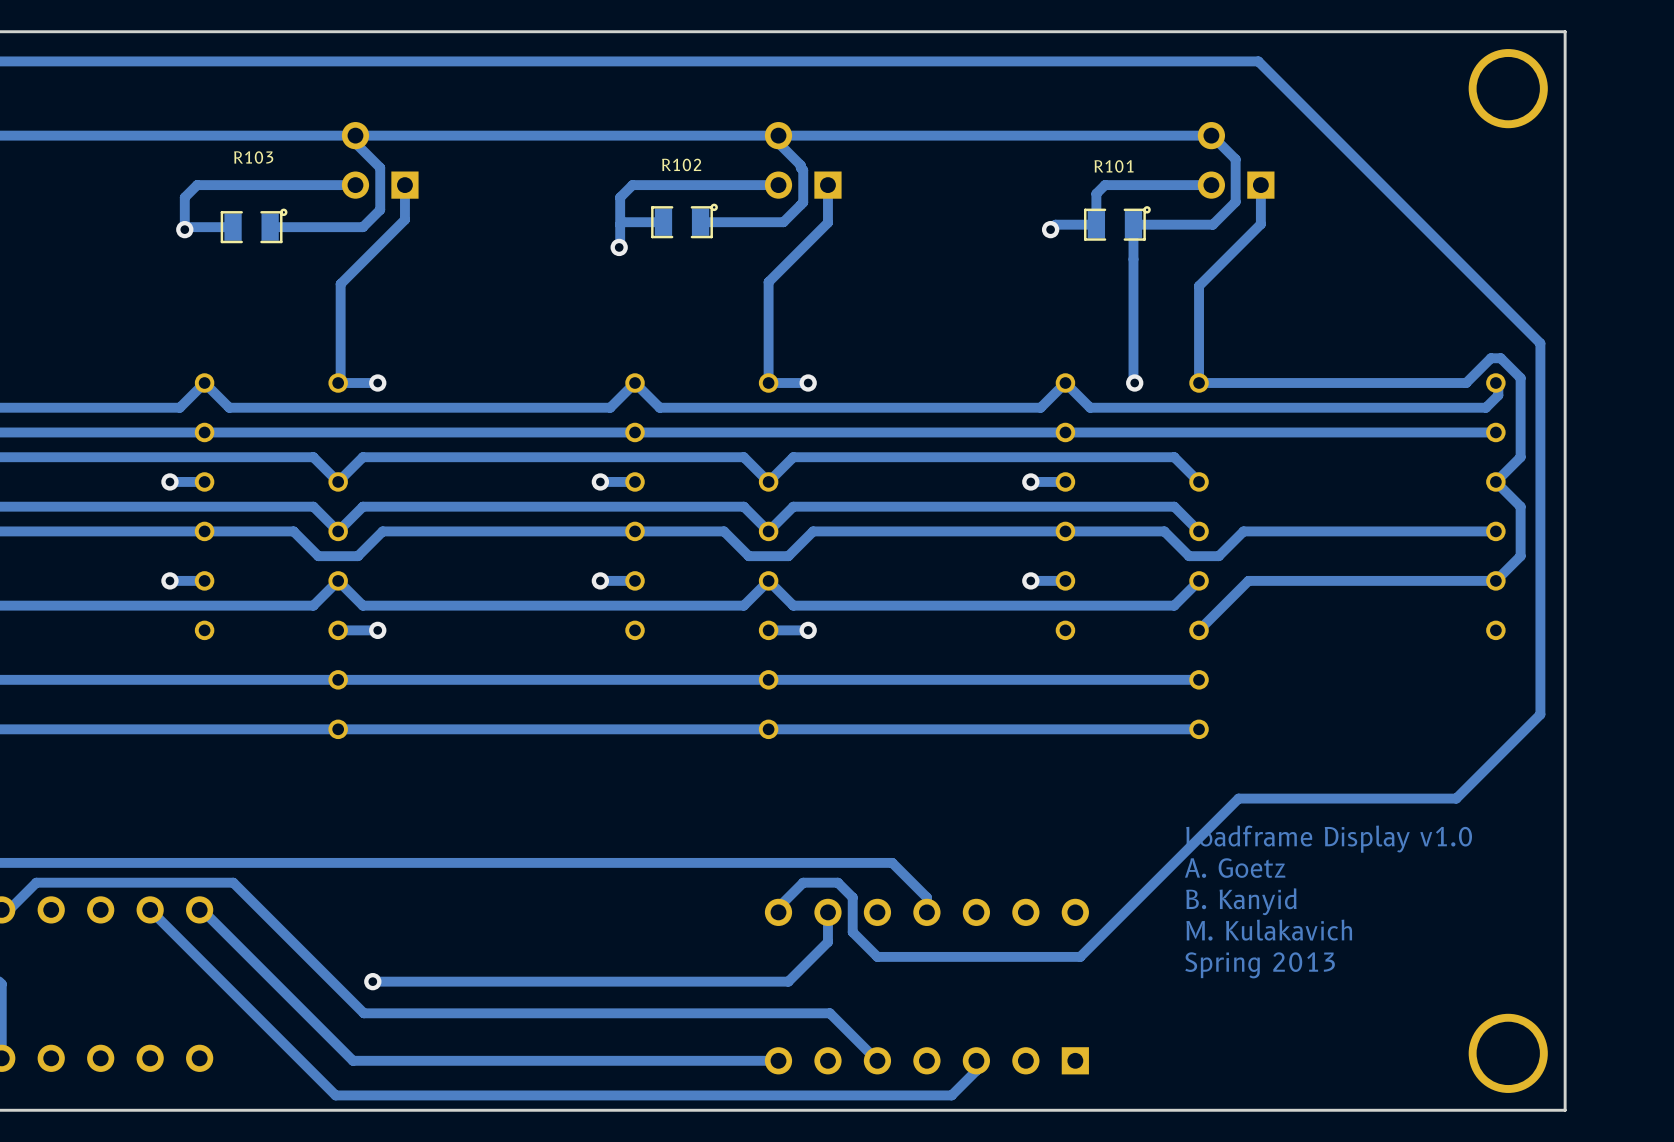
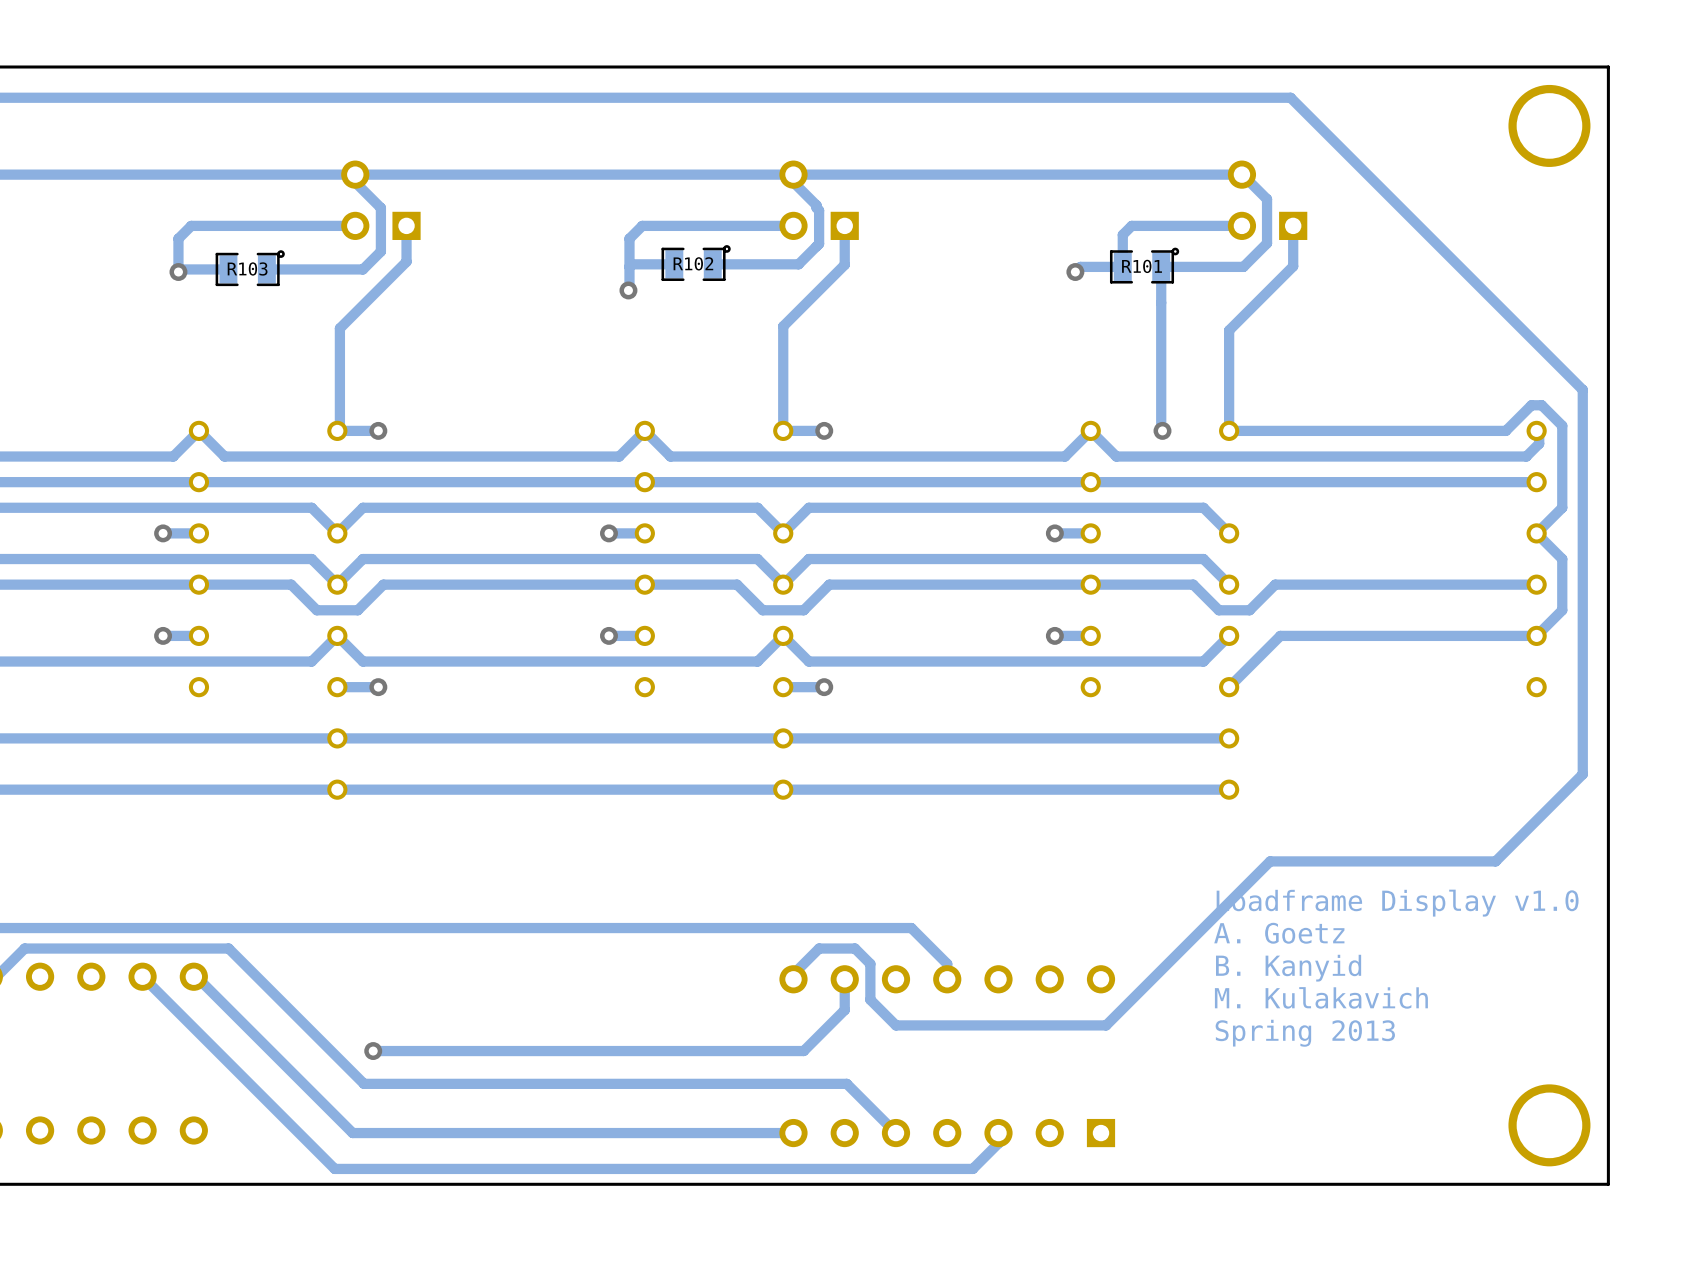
R103 name position: R103 (253, 157) -> R103 (247, 268)
R102 name position: R102 (681, 164) -> R102 (693, 263)
R101 name position: R101 (1114, 166) -> R101 (1142, 266)

